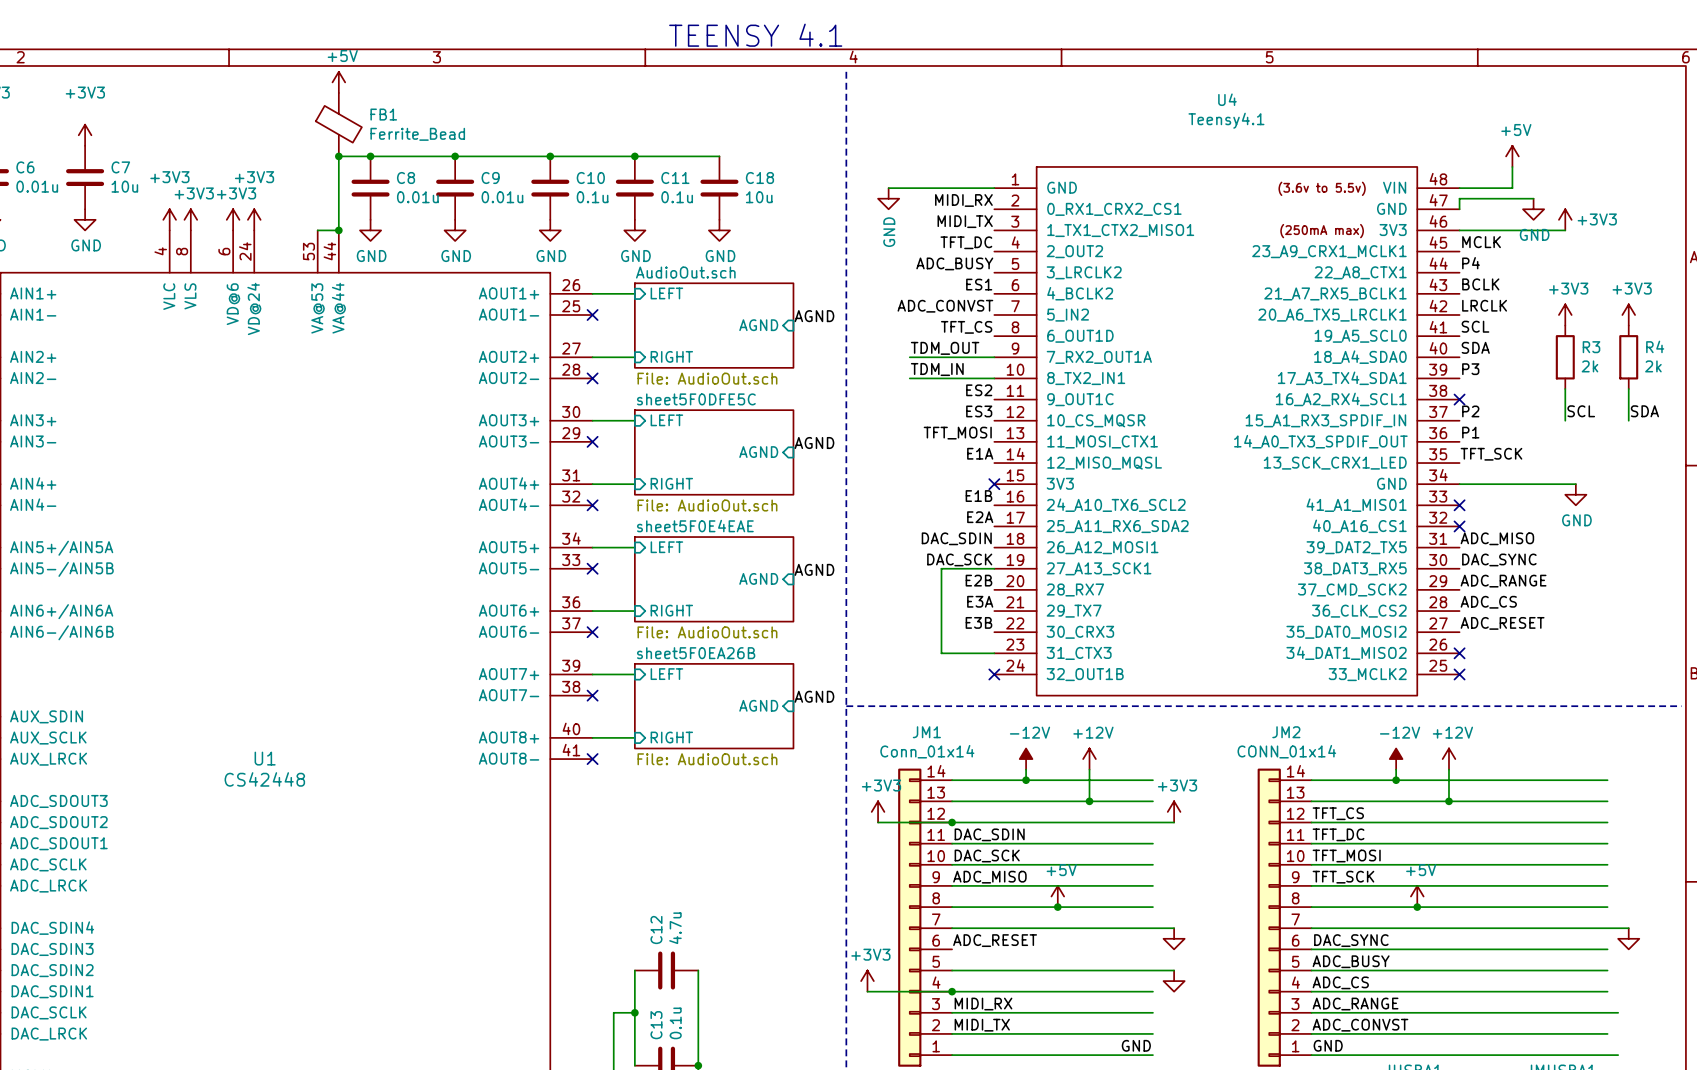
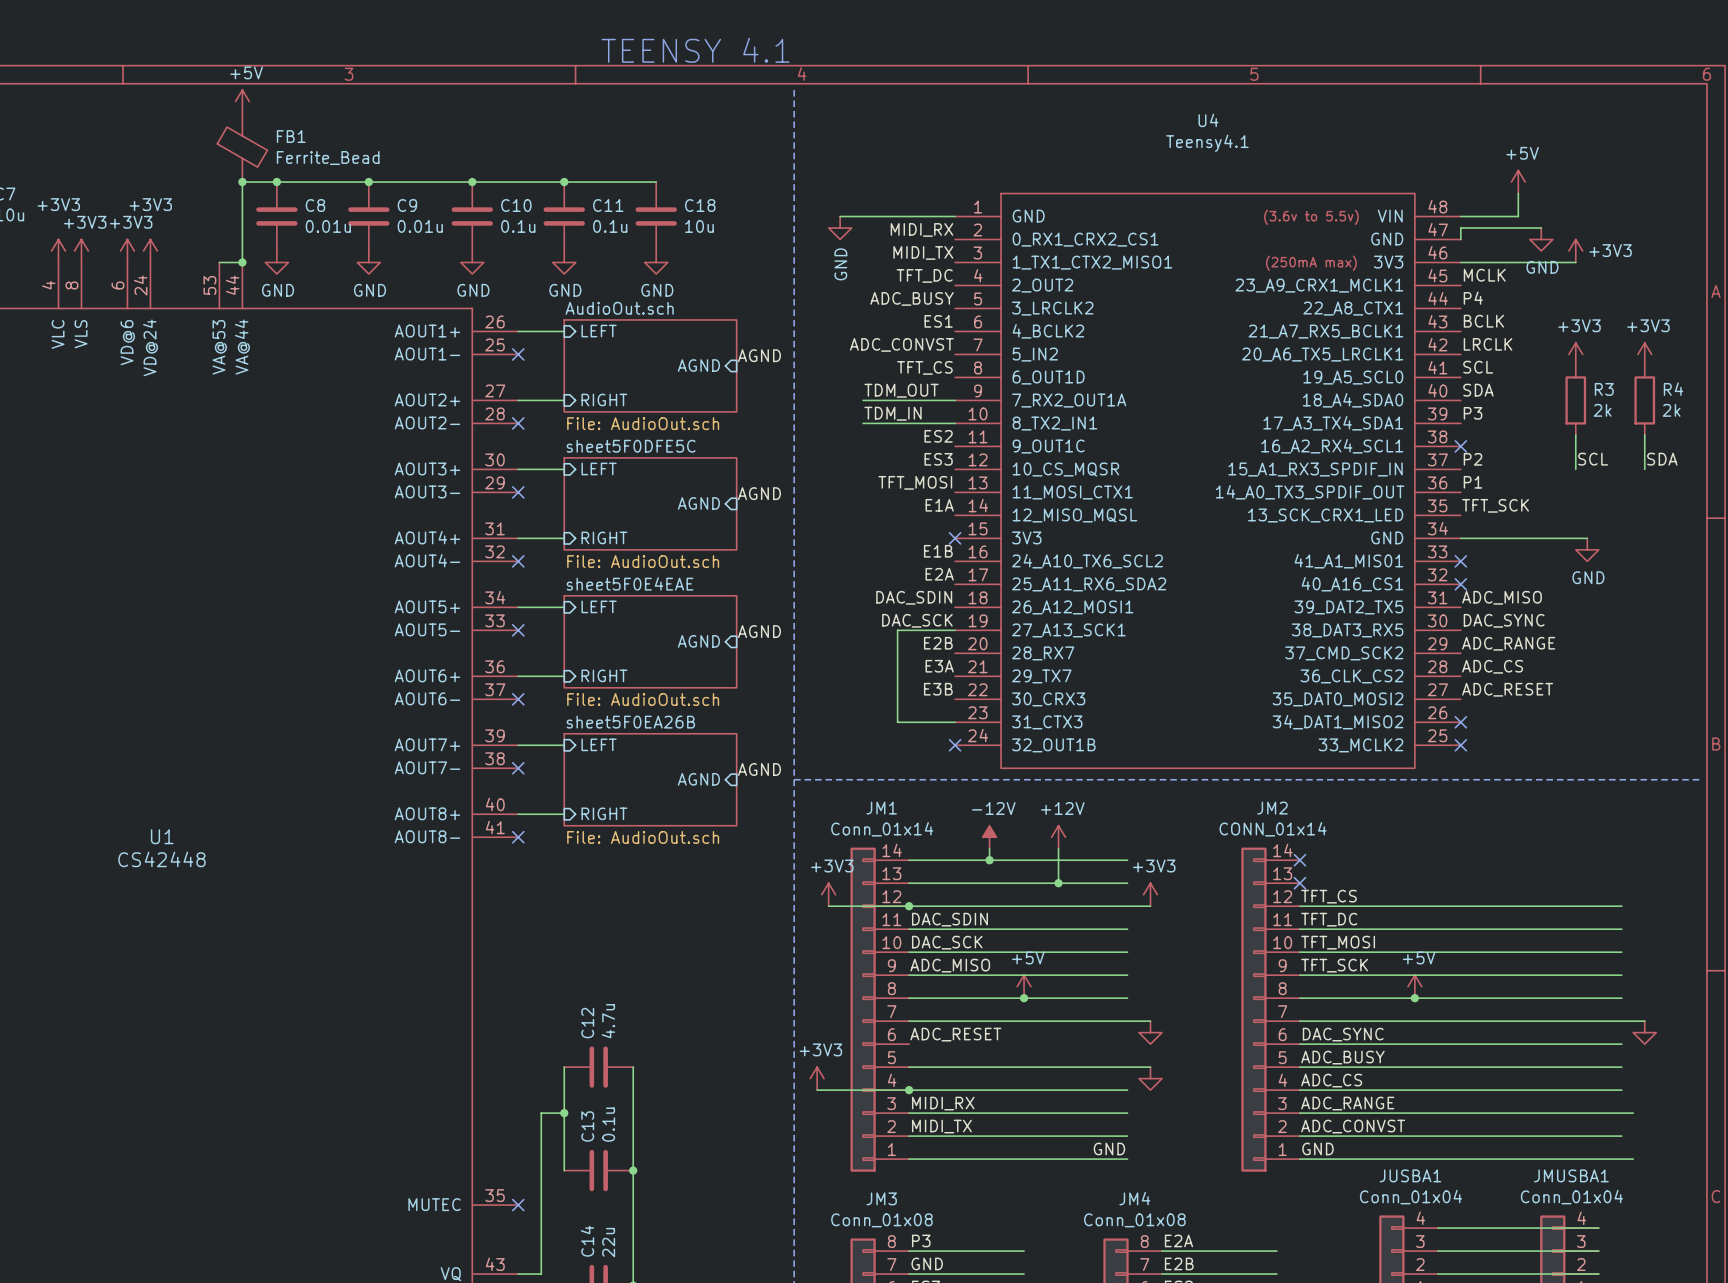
power symbol: -12V (1396, 759) -> none
power symbol: +12V (1448, 759) -> none
wire: (1396, 769) (1396, 780) -> none
wire: (1448, 769) (1448, 801) -> none
wire: (1311, 780) (1607, 780) -> none
no-connect mark: none -> (1299, 860)
junction: (1396, 780) -> none
wire: (1311, 801) (1607, 801) -> none
no-connect mark: none -> (1299, 883)
junction: (1448, 801) -> none

